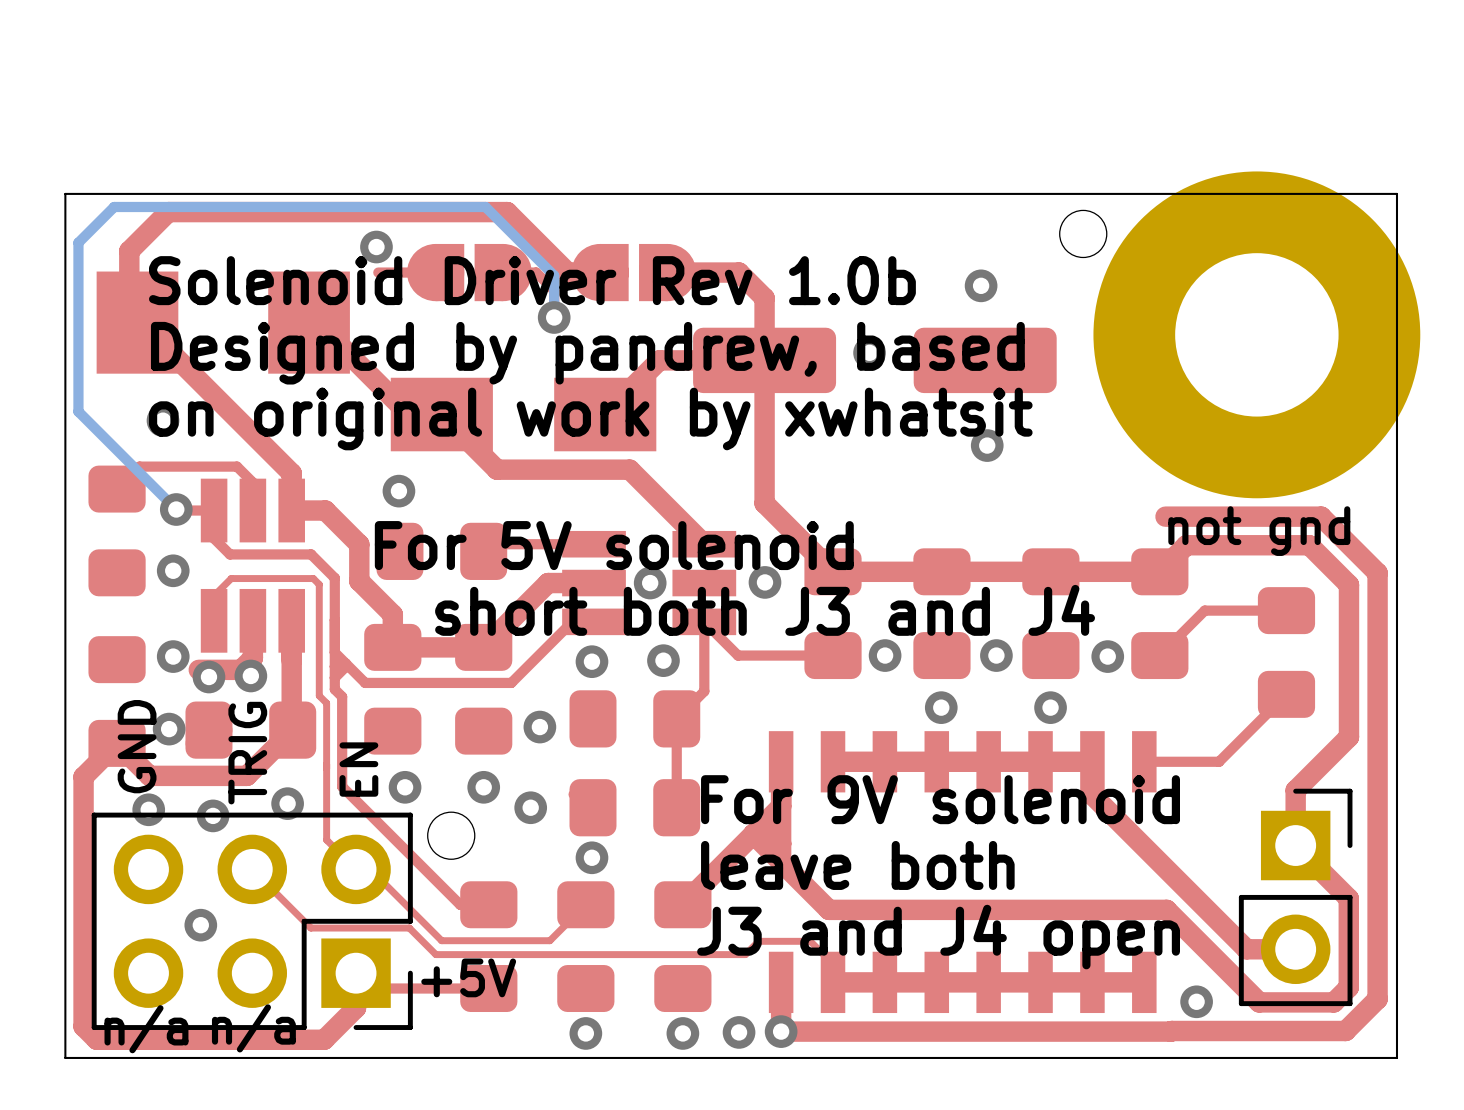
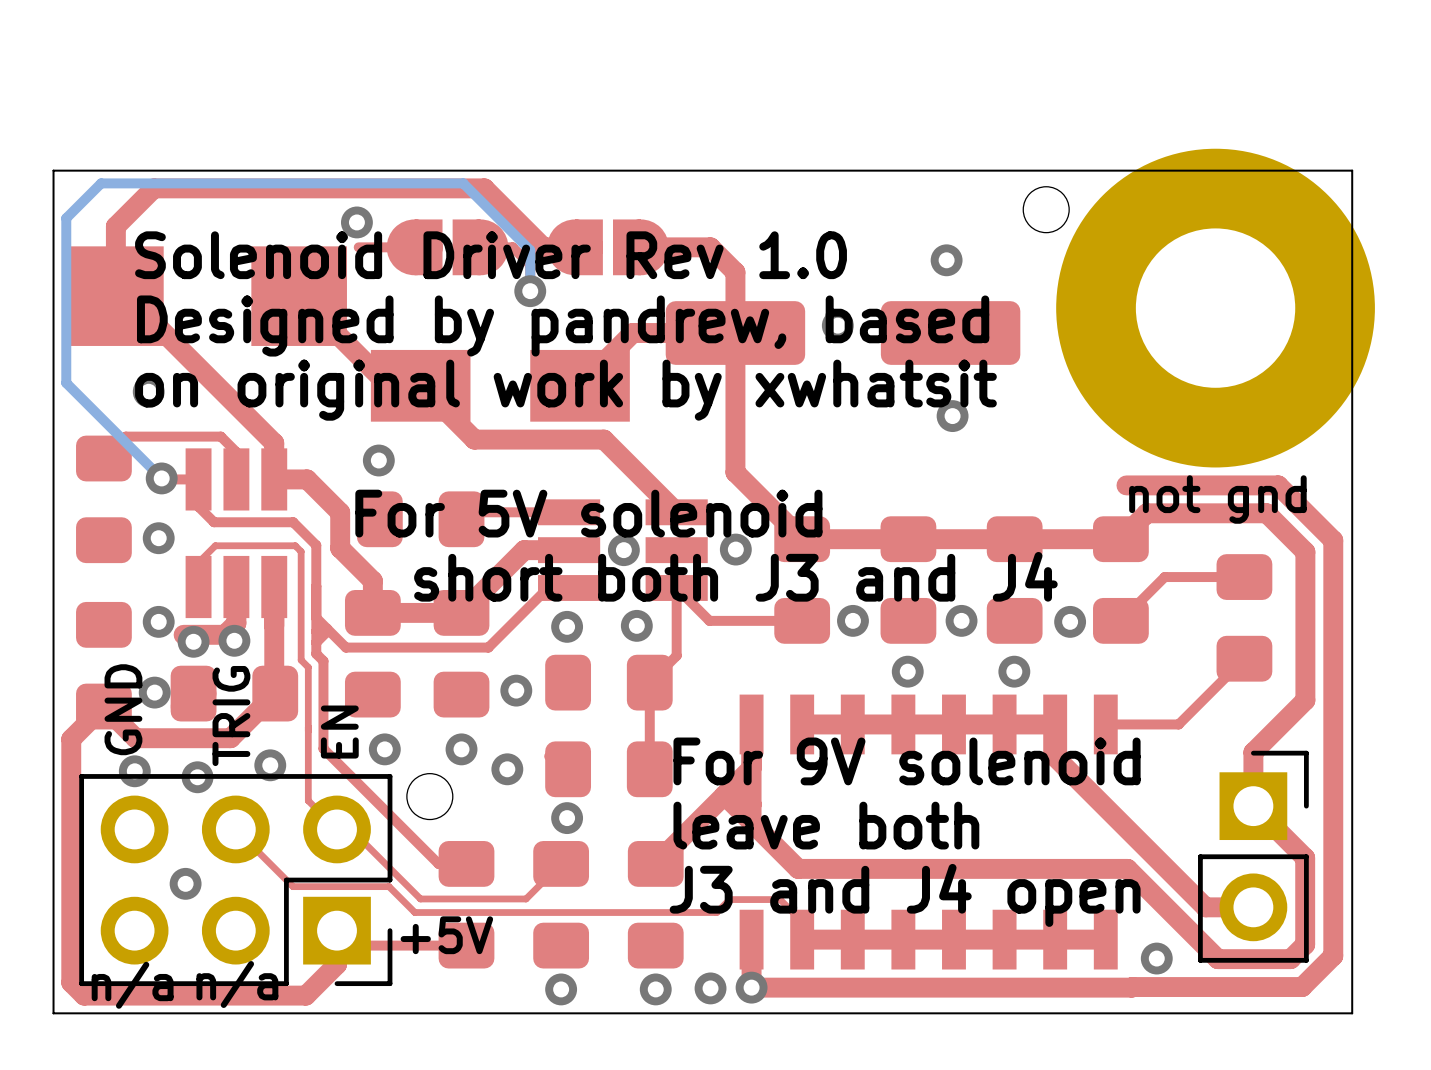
part footprint: [96, 271, 350, 374] -> [68, 246, 347, 346]
text: Solenoid Driver Rev 1.0b (532, 280) -> Solenoid Driver Rev 1.0 (491, 255)

